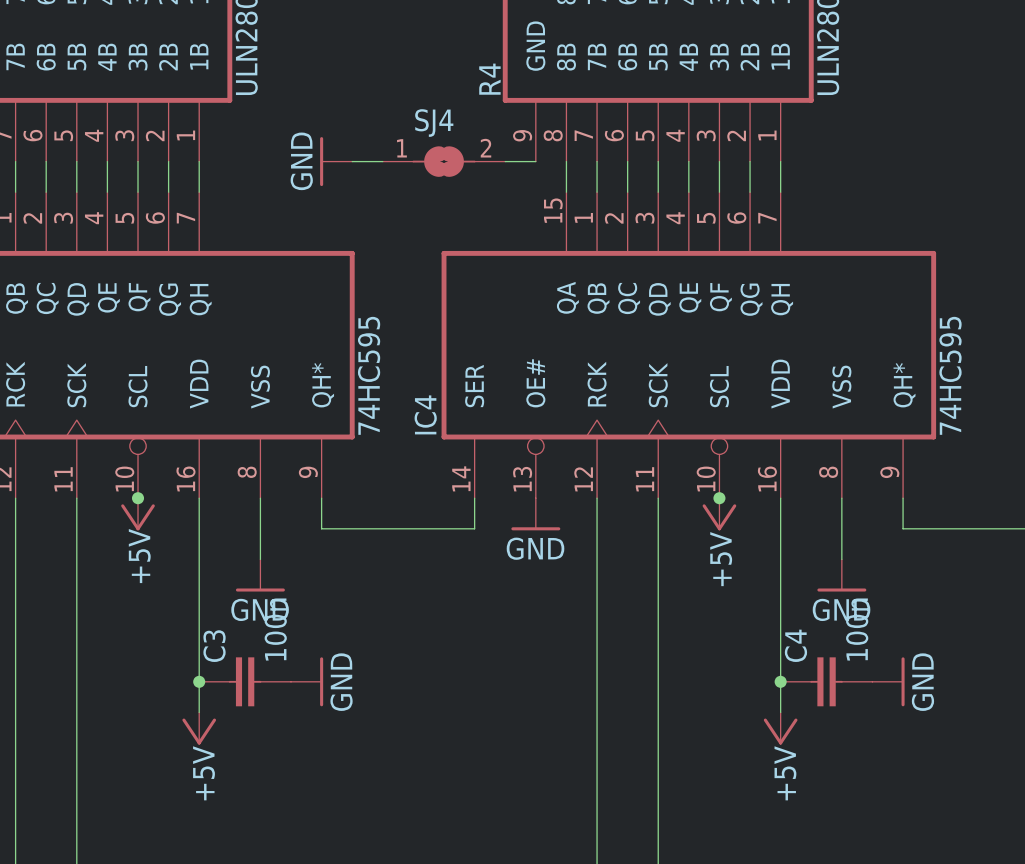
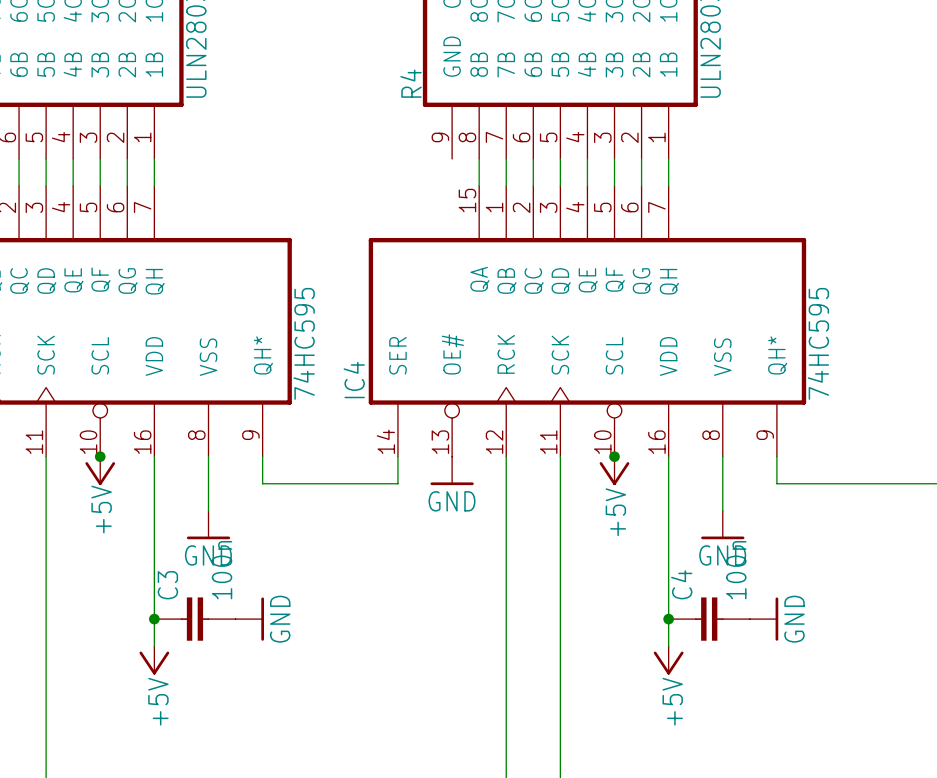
power symbol: GND (336, 161) -> none
wire: (352, 161) (382, 161) -> none
SJ4: (444, 161) -> none
wire: (505, 161) (535, 161) -> none

